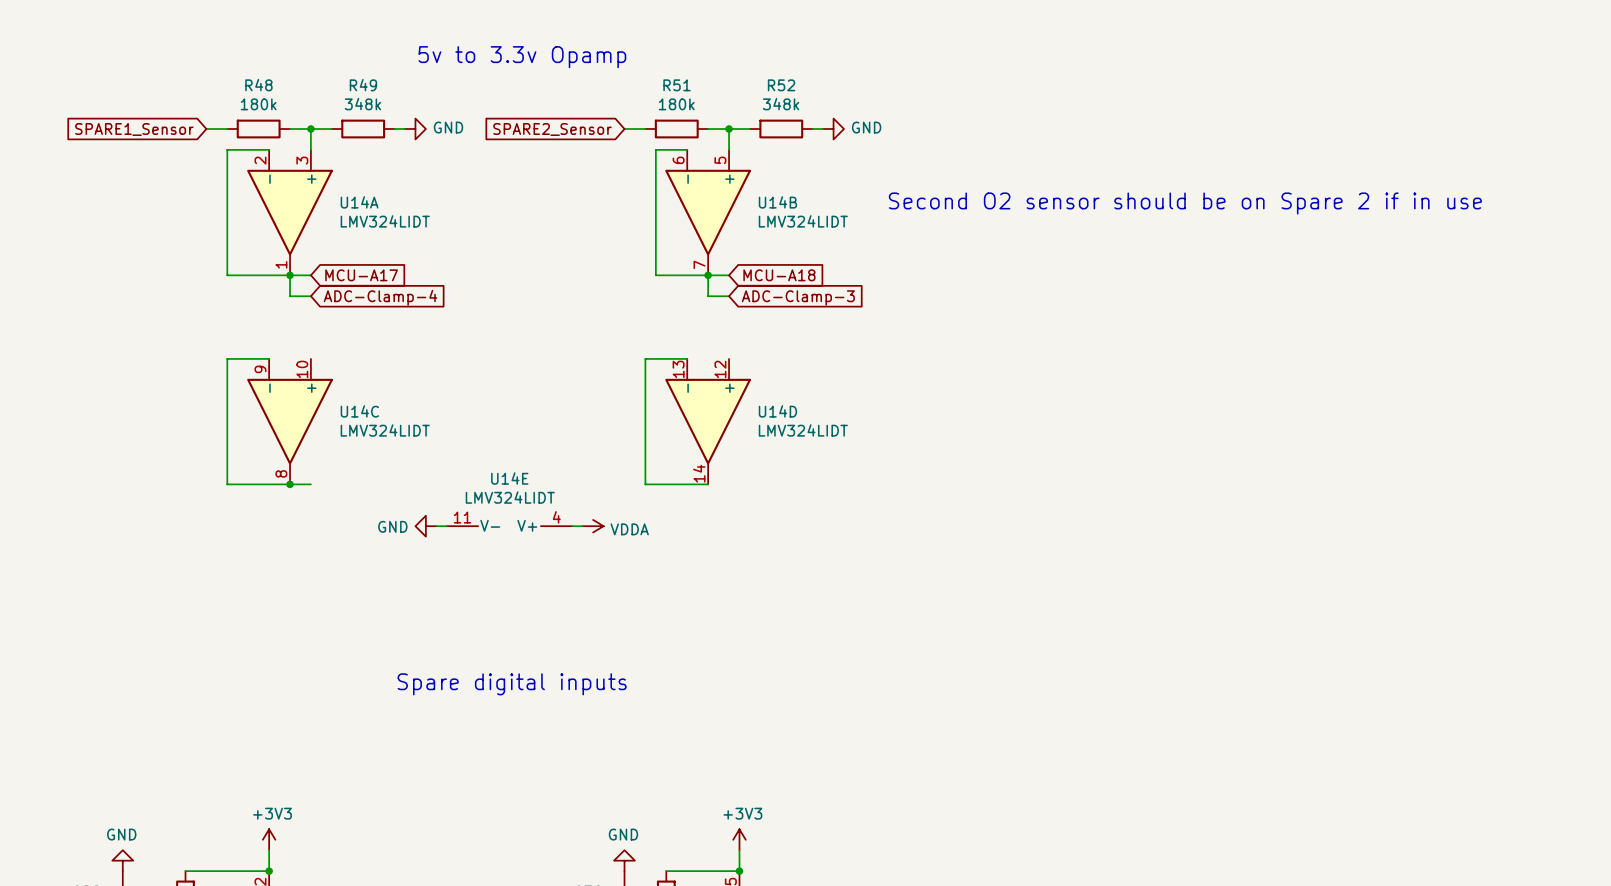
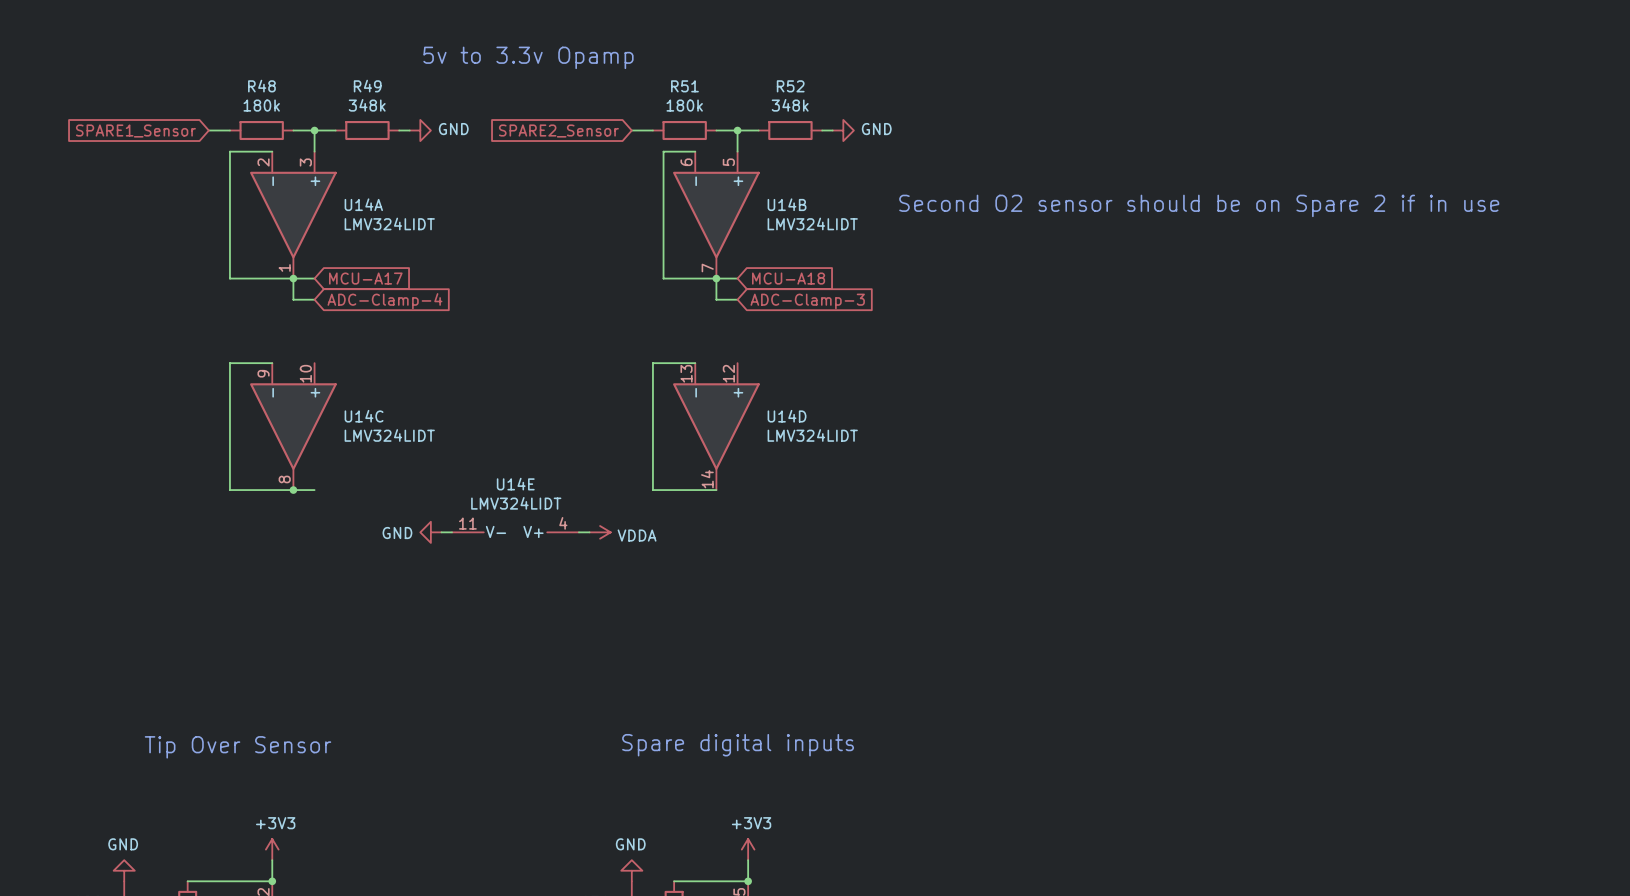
text: Spare digital inputs (512, 684) -> none
text: none -> Spare digital inputs (738, 745)
text: none -> Tip Over Sensor (237, 747)

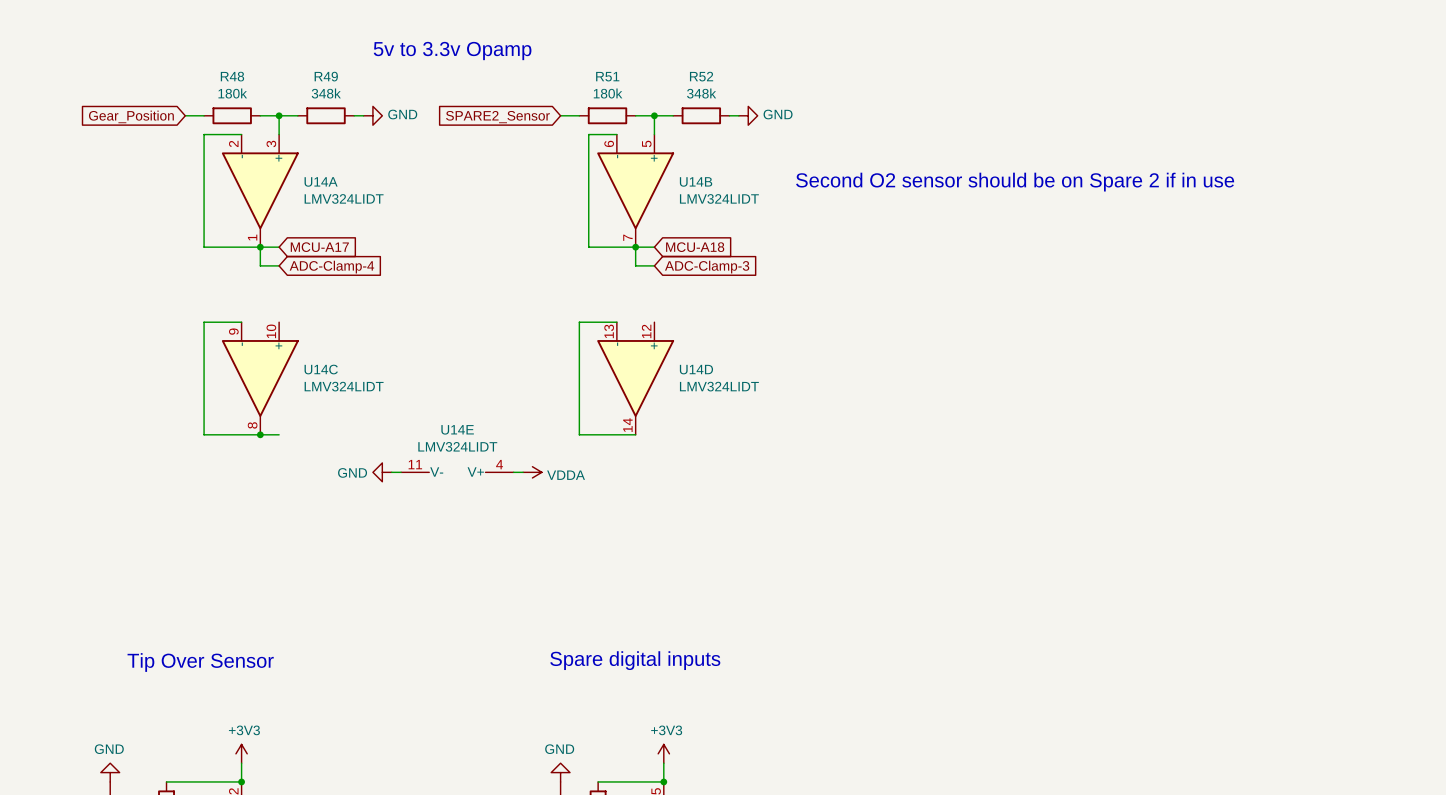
global label: SPARE1_Sensor (135, 131) -> Gear_Position (131, 116)

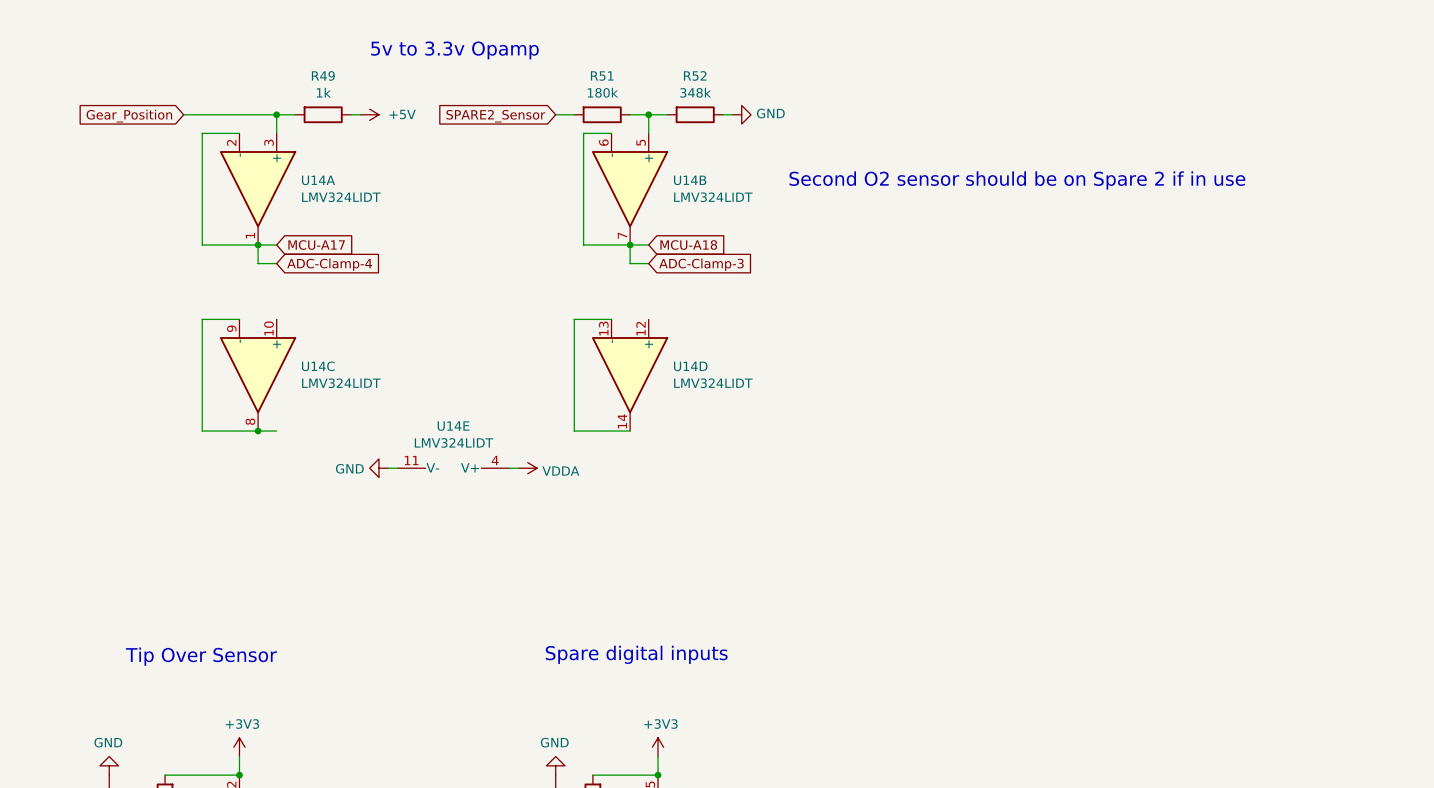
R49 value: 348k (326, 93) -> 1k (323, 92)
wire: none -> (202, 114) (258, 114)
R48: 180k (232, 115) -> none
power symbol: GND (372, 115) -> +5V (369, 114)

